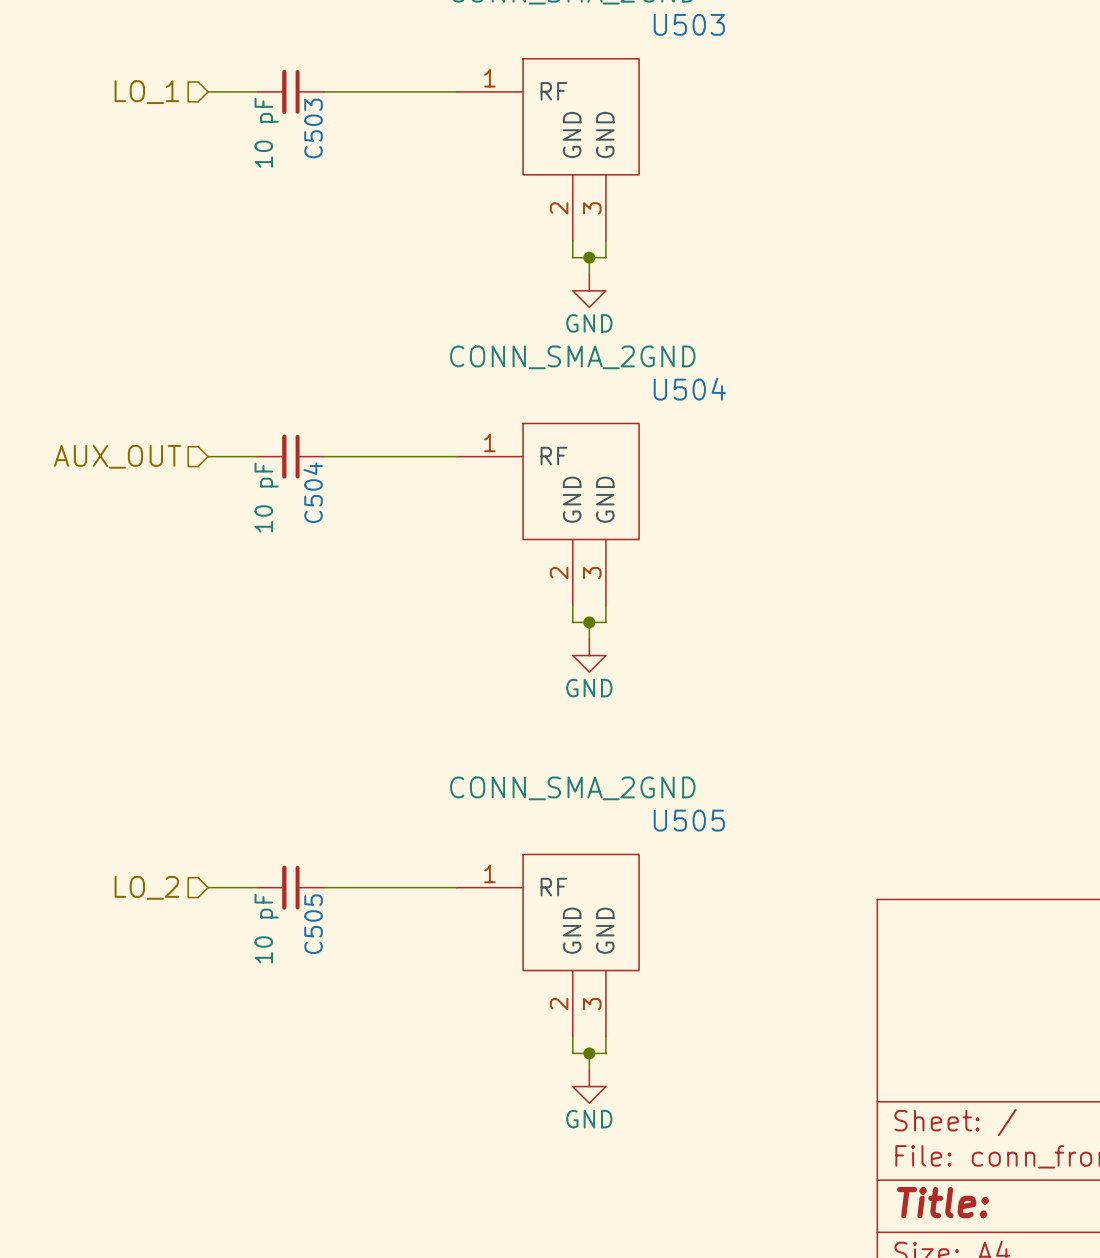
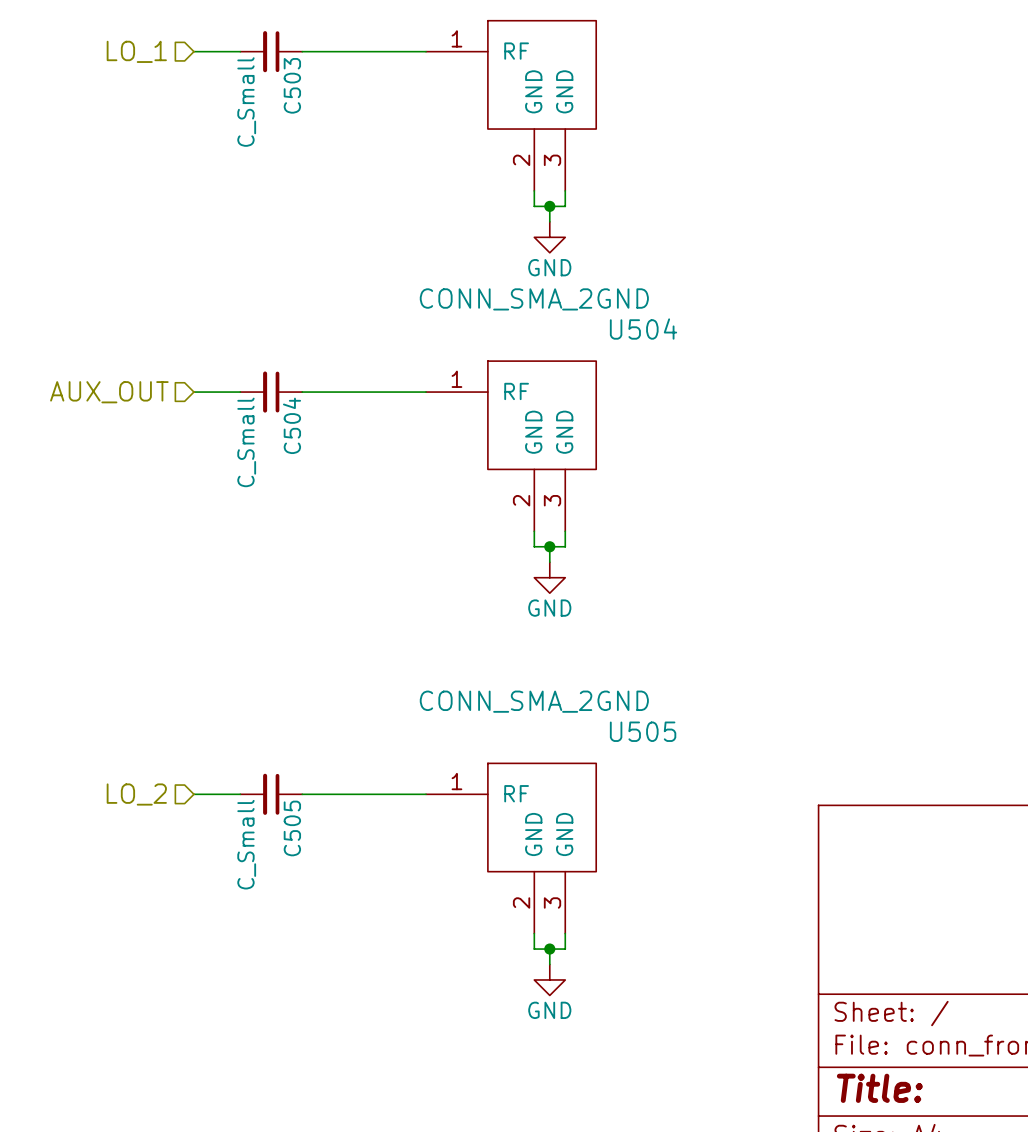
C503 value: 10 pF (266, 132) -> C_Small (246, 102)
C504 value: 10 pF (266, 497) -> C_Small (246, 442)
C505 value: 10 pF (266, 928) -> C_Small (246, 844)

